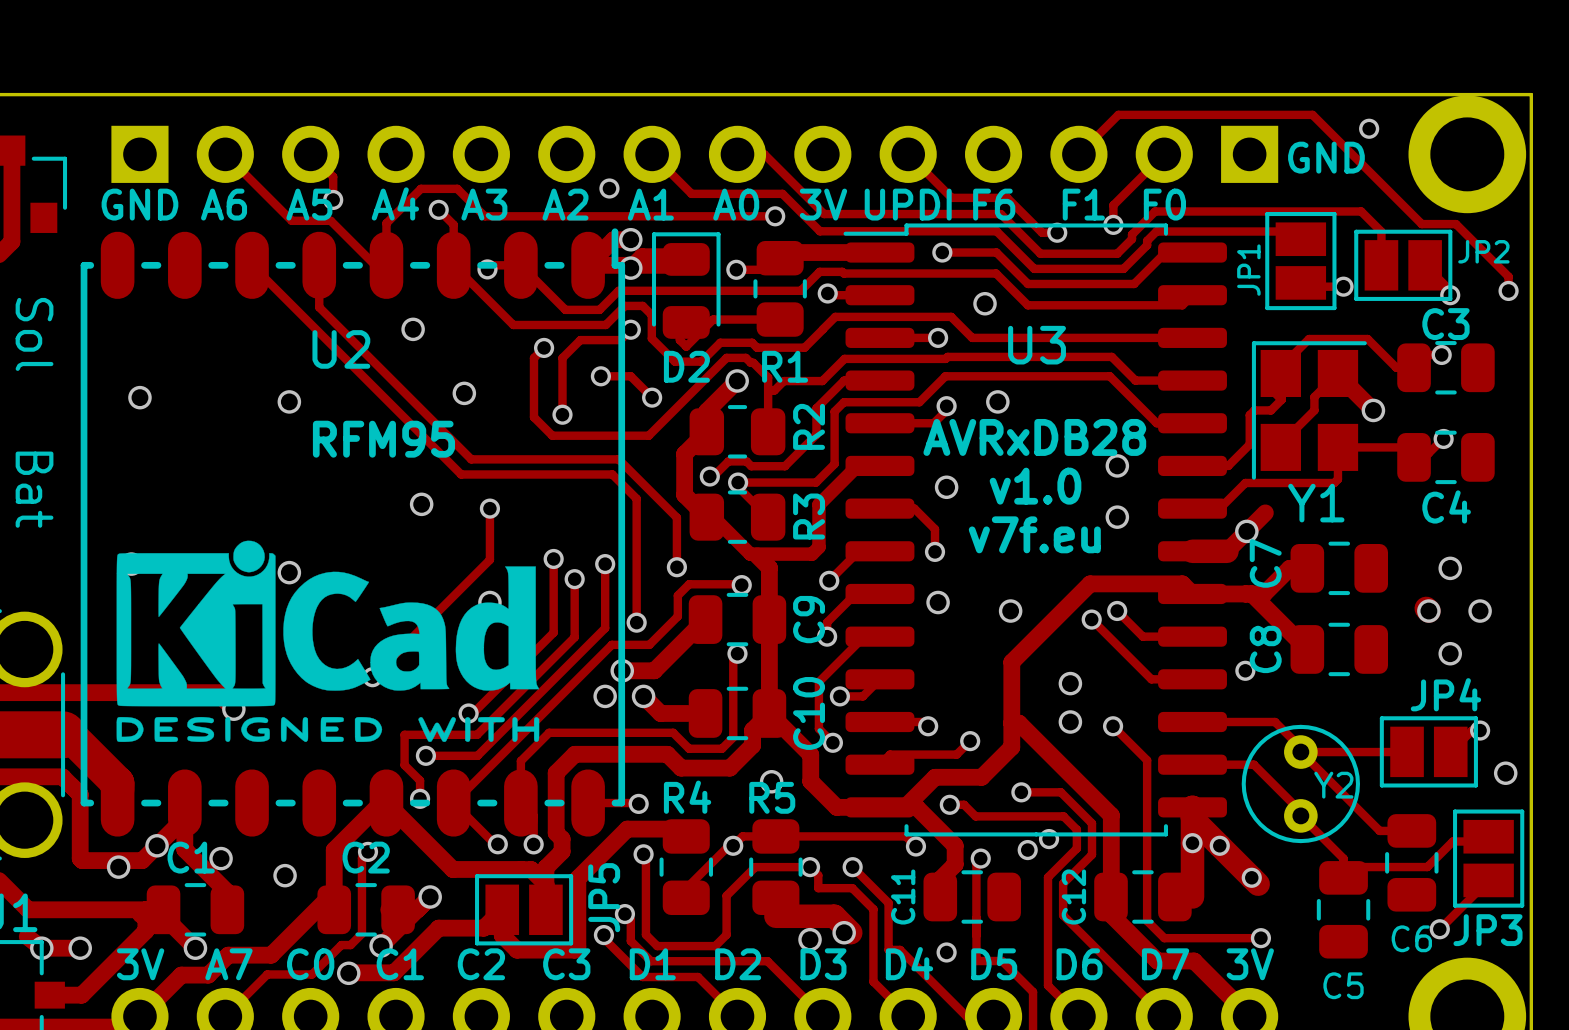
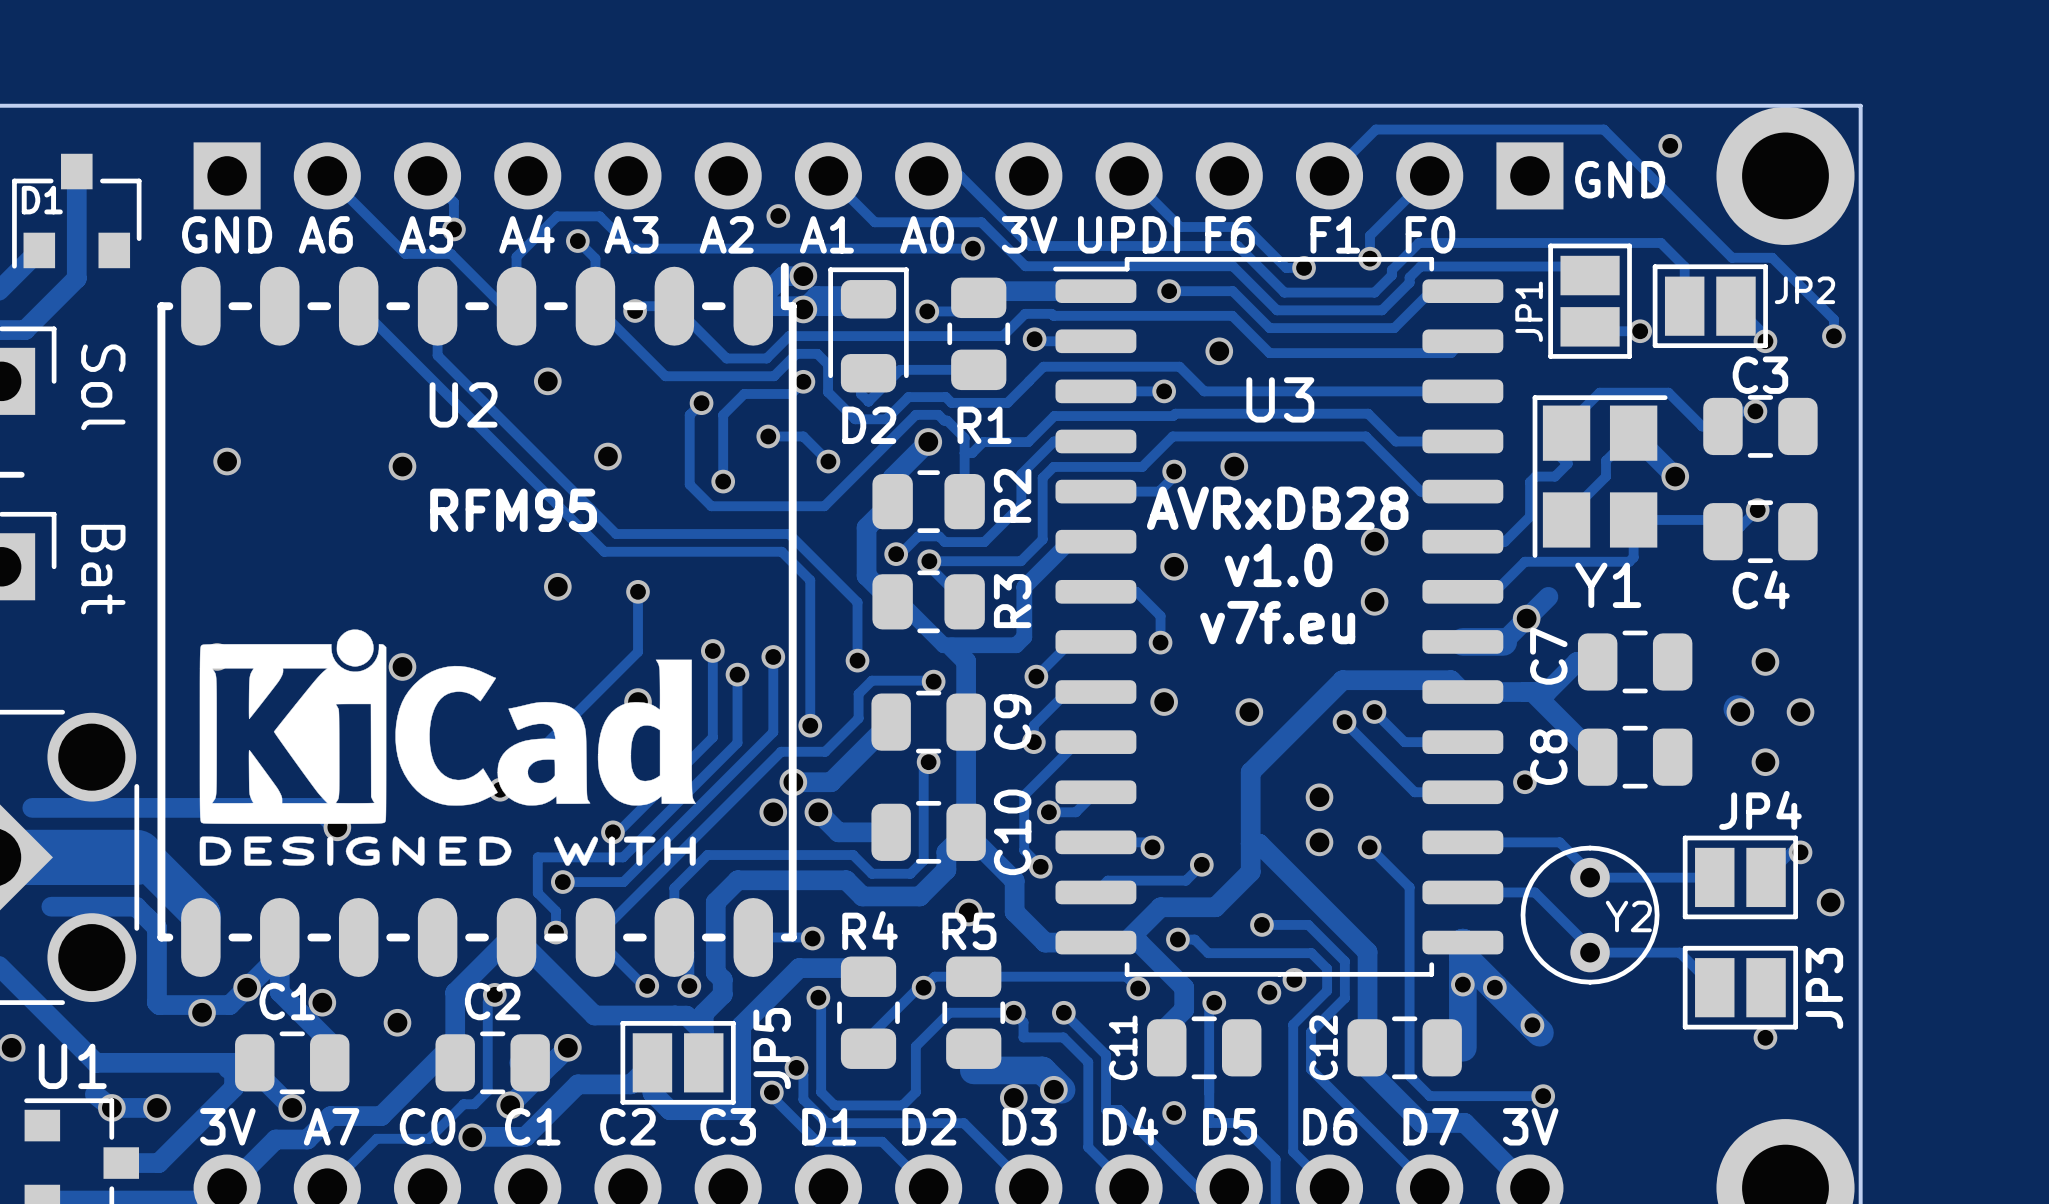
track: (1300, 752) (1379, 830) (1411, 830) -> none
track: (1300, 815) (1343, 858) (1343, 877) (1354, 867) (1427, 867) (1452, 841) (1488, 841) (1488, 836) -> (1590, 952) (1679, 952) (1714, 987)
JP3 rotation: 0° (1488, 858) -> 90° clockwise (1740, 987)
JP3 position: (1488, 858) -> (1740, 987)
C6: (1411, 862) -> none
track: (1488, 880) (1439, 929) -> none
C5: (1343, 909) -> none
via position: (1439, 929) -> (1765, 1037)
JP3 name position: JP3 (1488, 930) -> JP3 (1824, 988)

